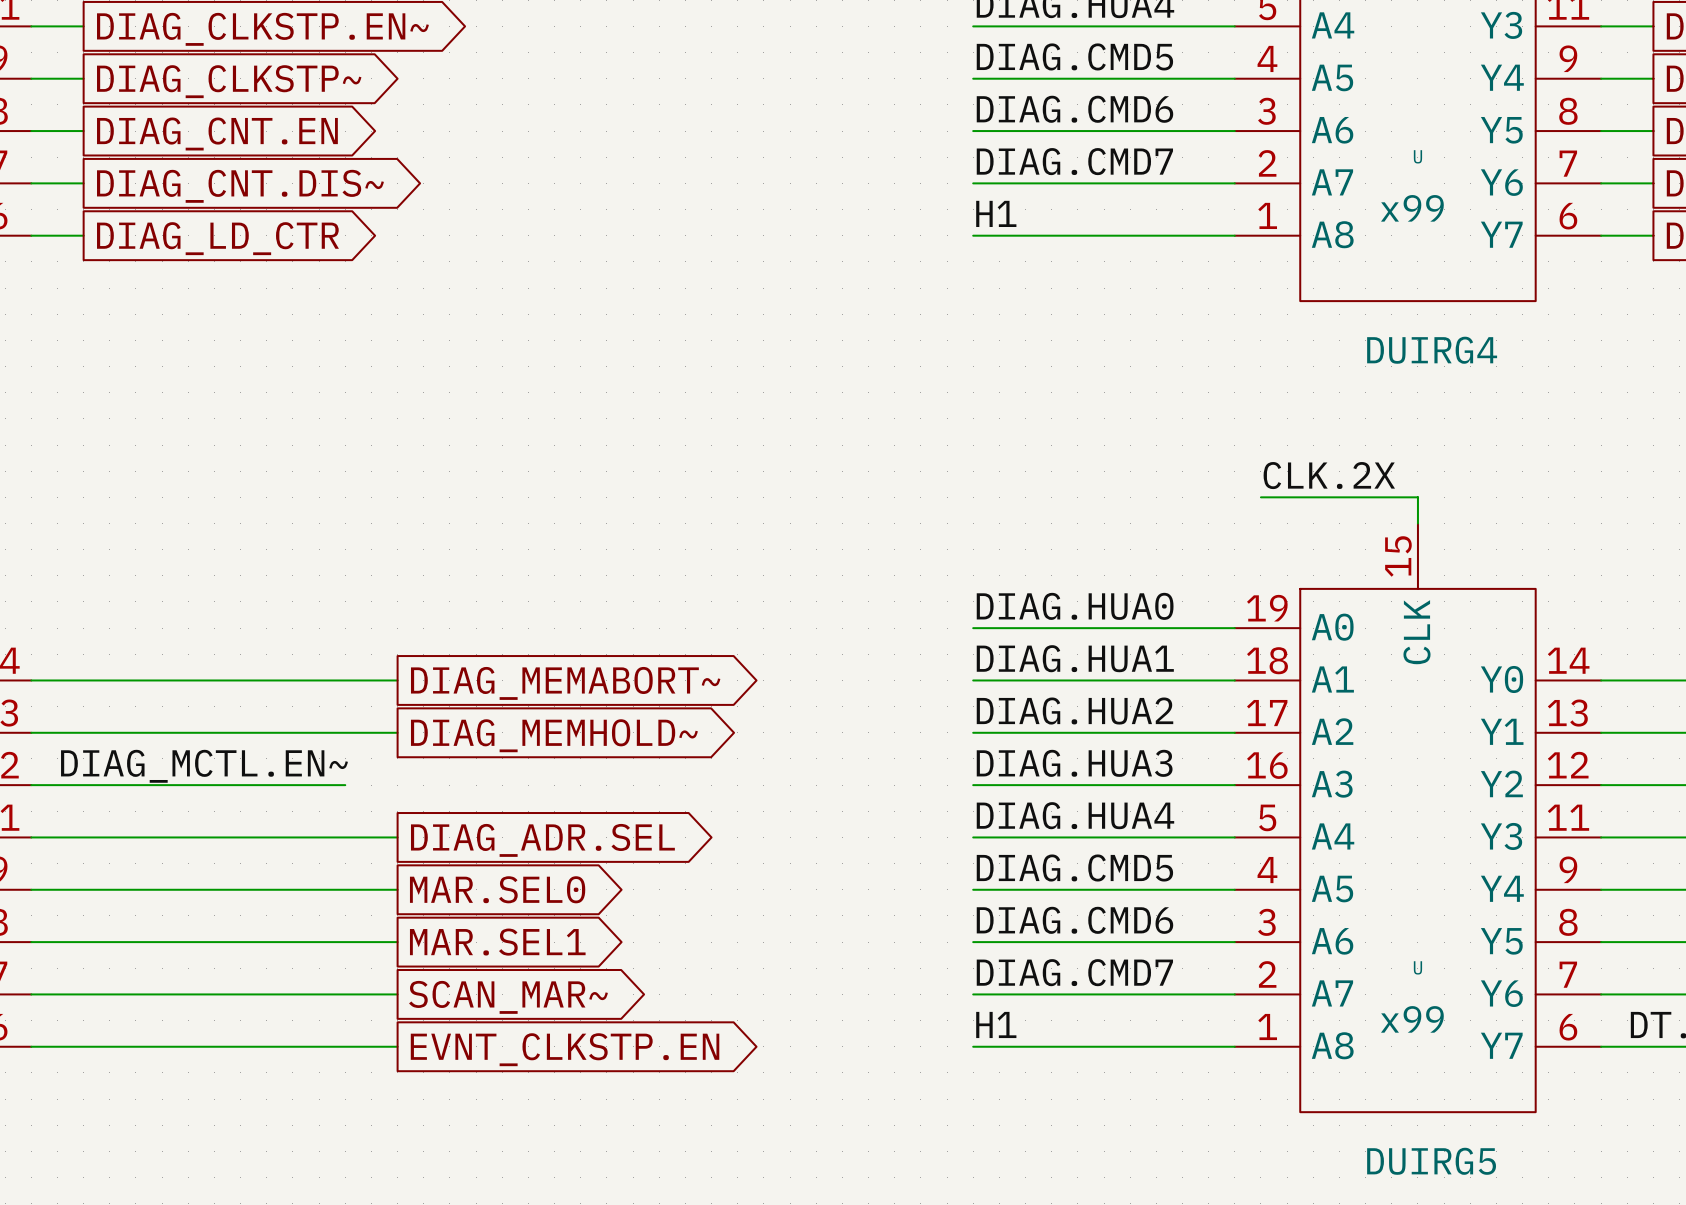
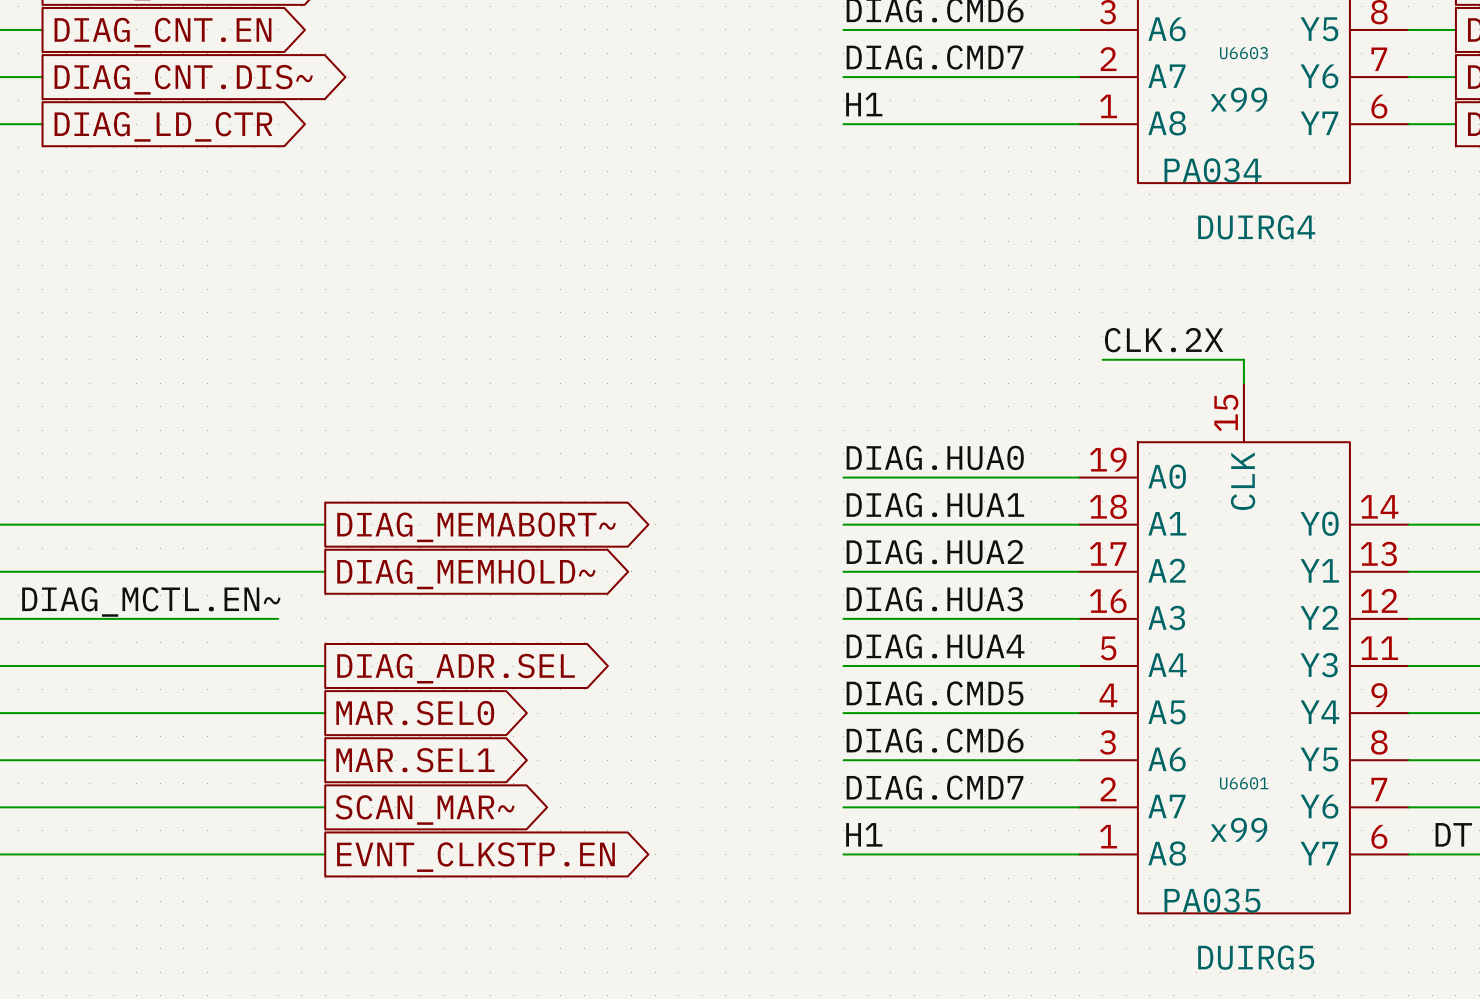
U name: U (1417, 156) -> U6603 (1243, 53)
U value: none -> PA034 (1212, 170)
U name: U (1417, 967) -> U6601 (1244, 783)
U value: none -> PA035 (1212, 900)

